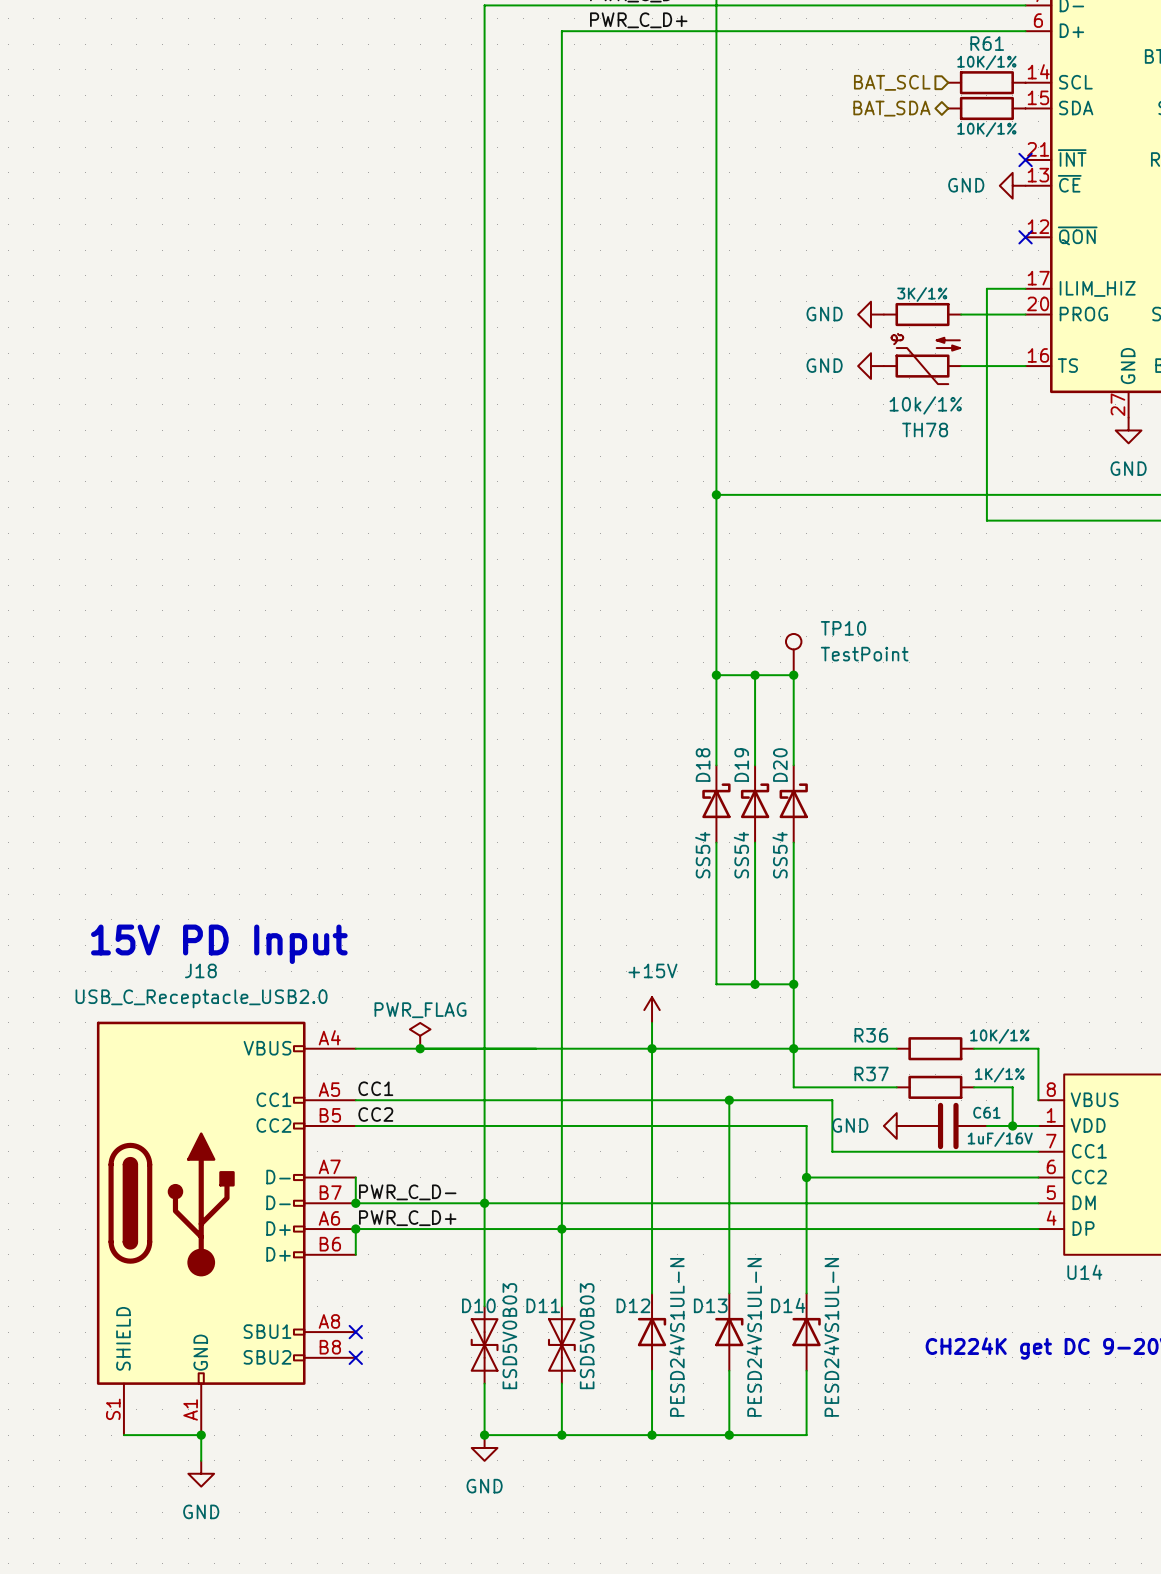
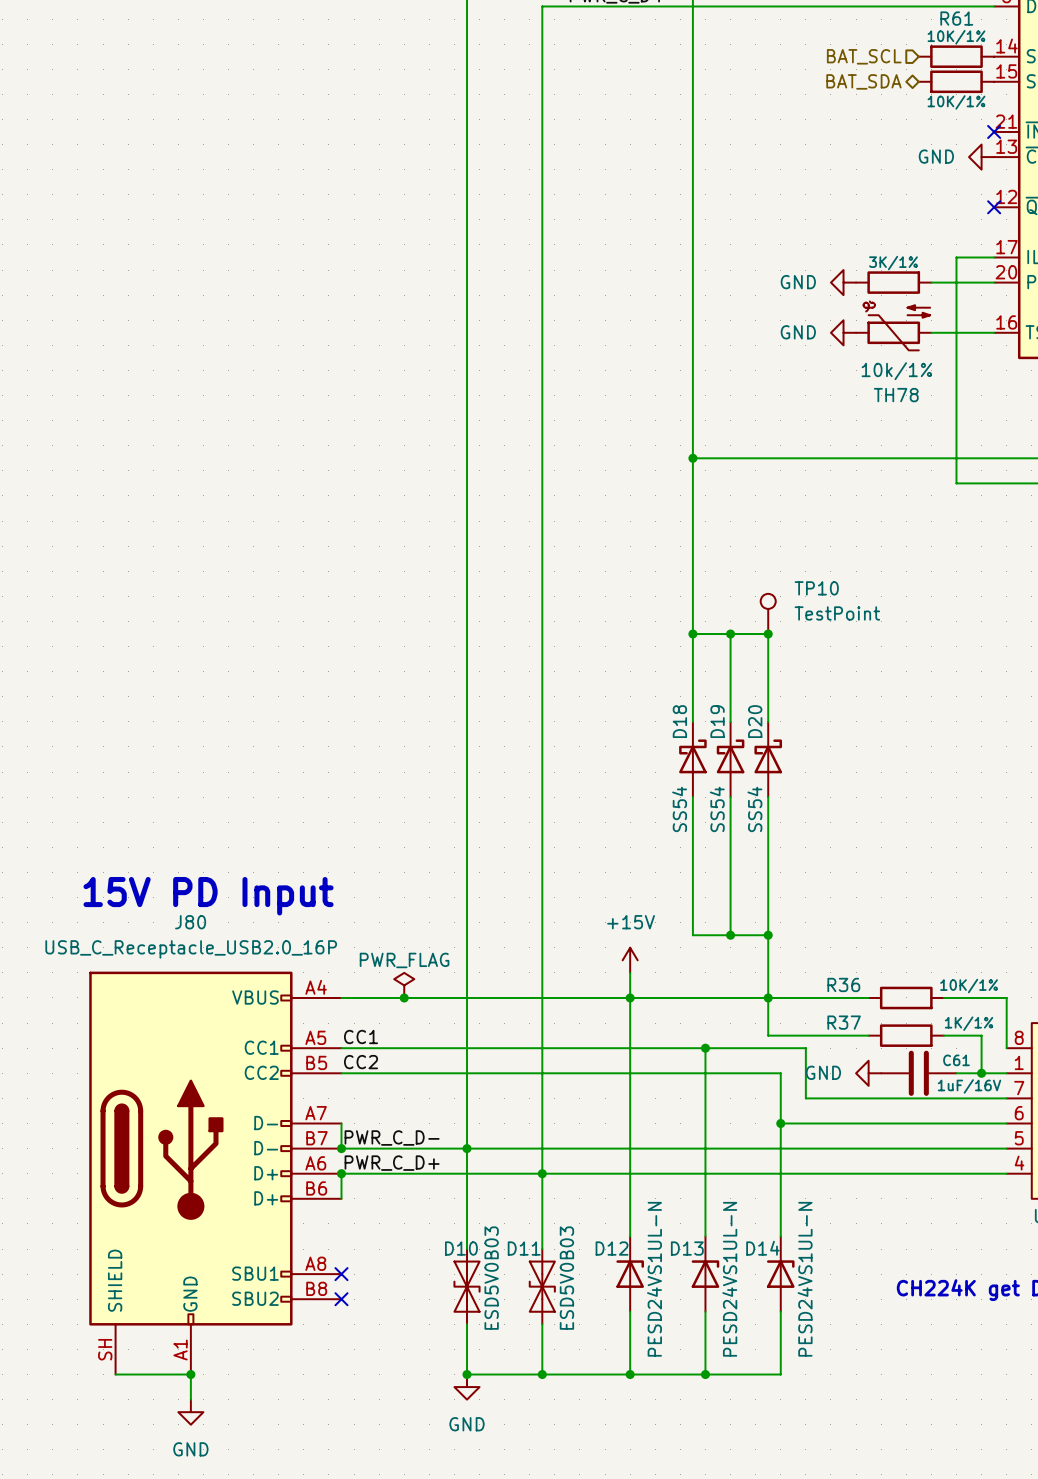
J18 name: J18 (200, 970) -> J80 (190, 922)
J18 value: USB_C_Receptacle_USB2.0 (201, 998) -> USB_C_Receptacle_USB2.0_16P (191, 949)
J18 pin number: S1 (113, 1409) -> SH (105, 1349)

